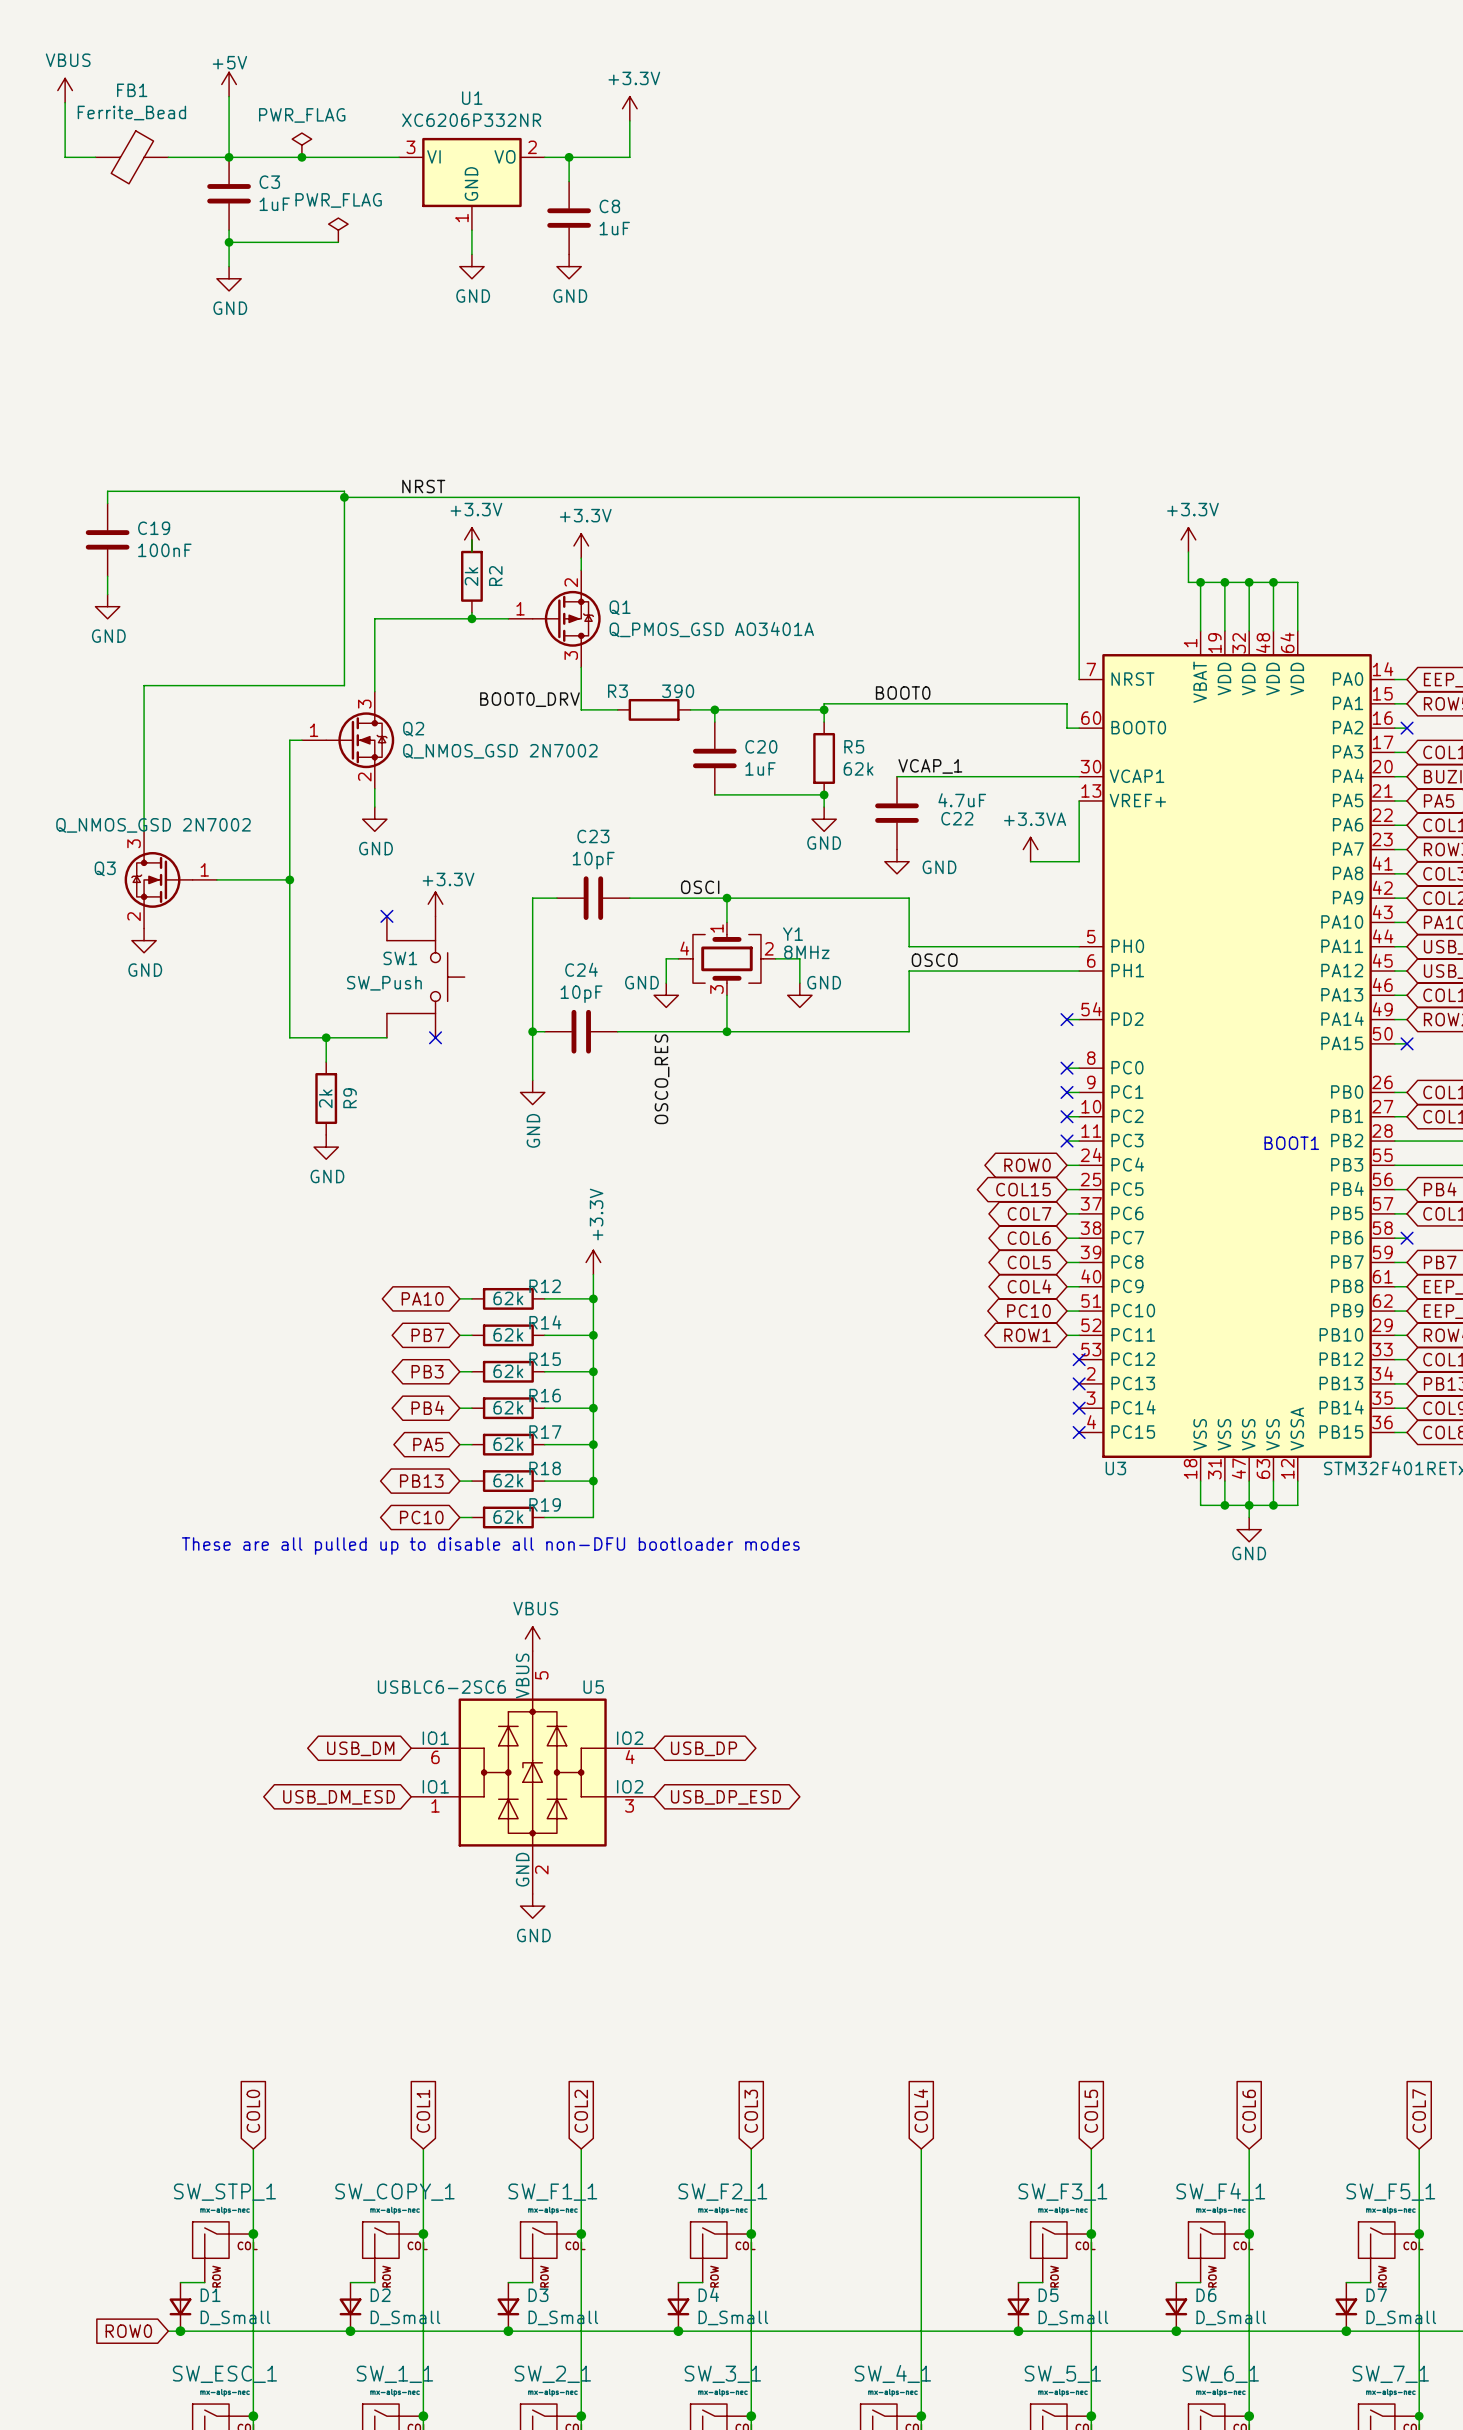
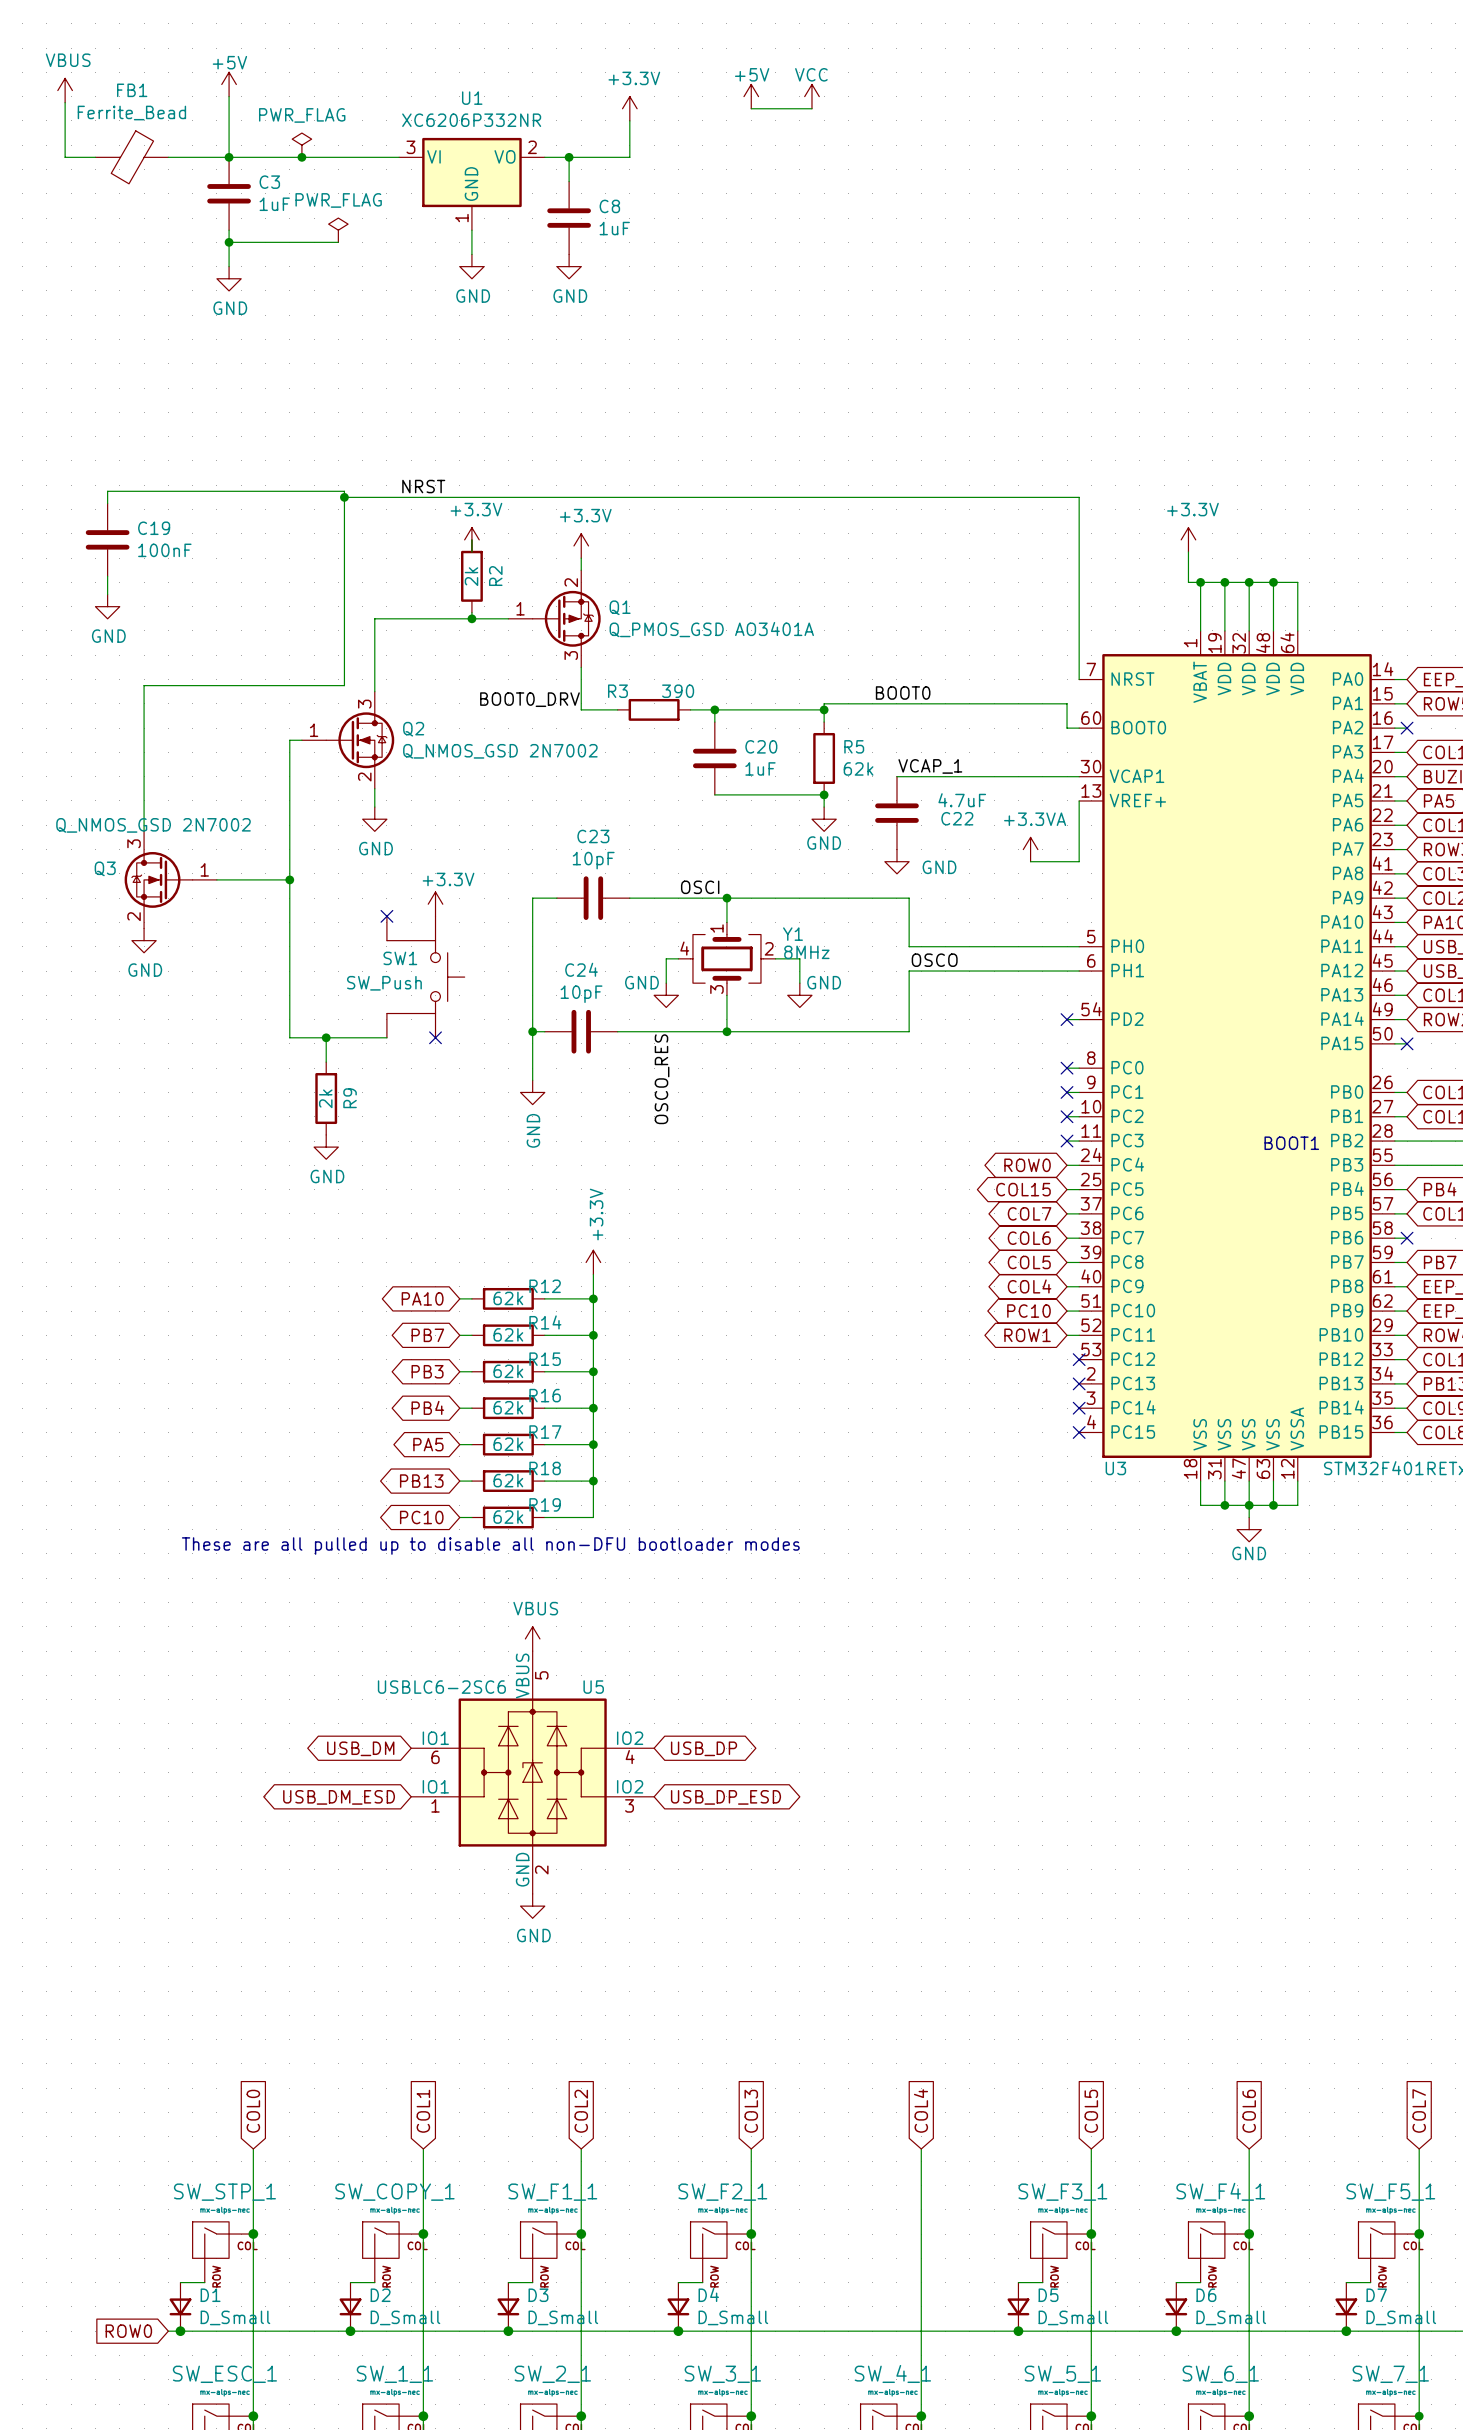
power symbol: none -> +5V (751, 96)
power symbol: none -> VCC (811, 96)
wire: none -> (751, 108) (811, 108)

